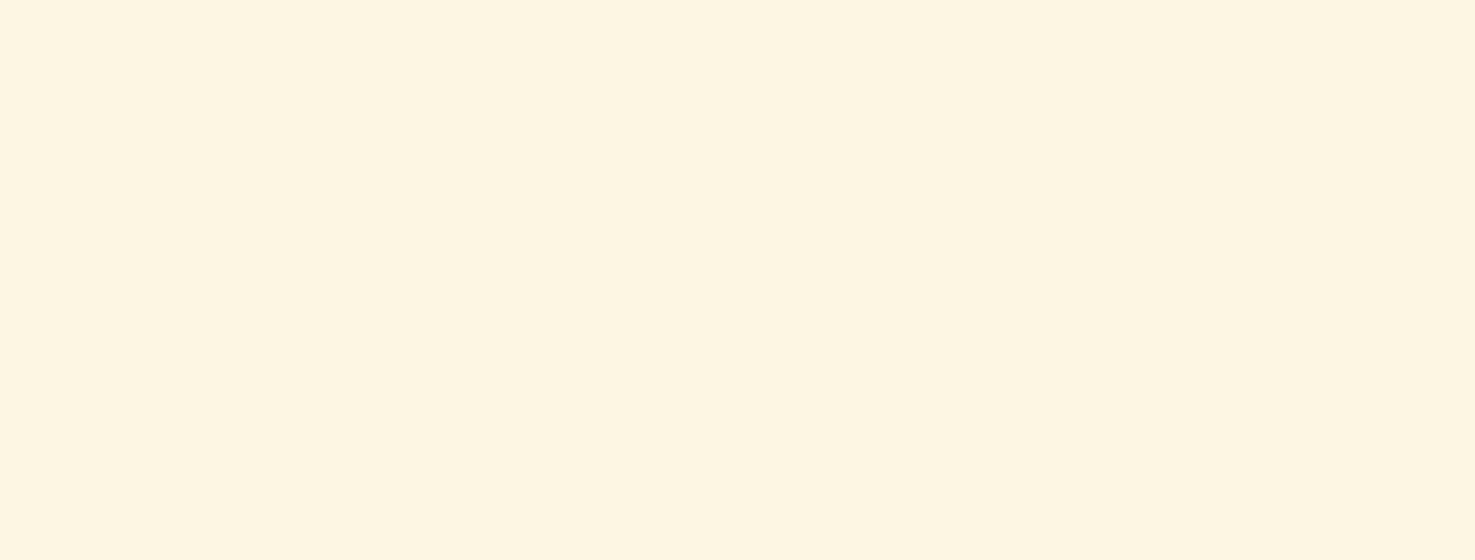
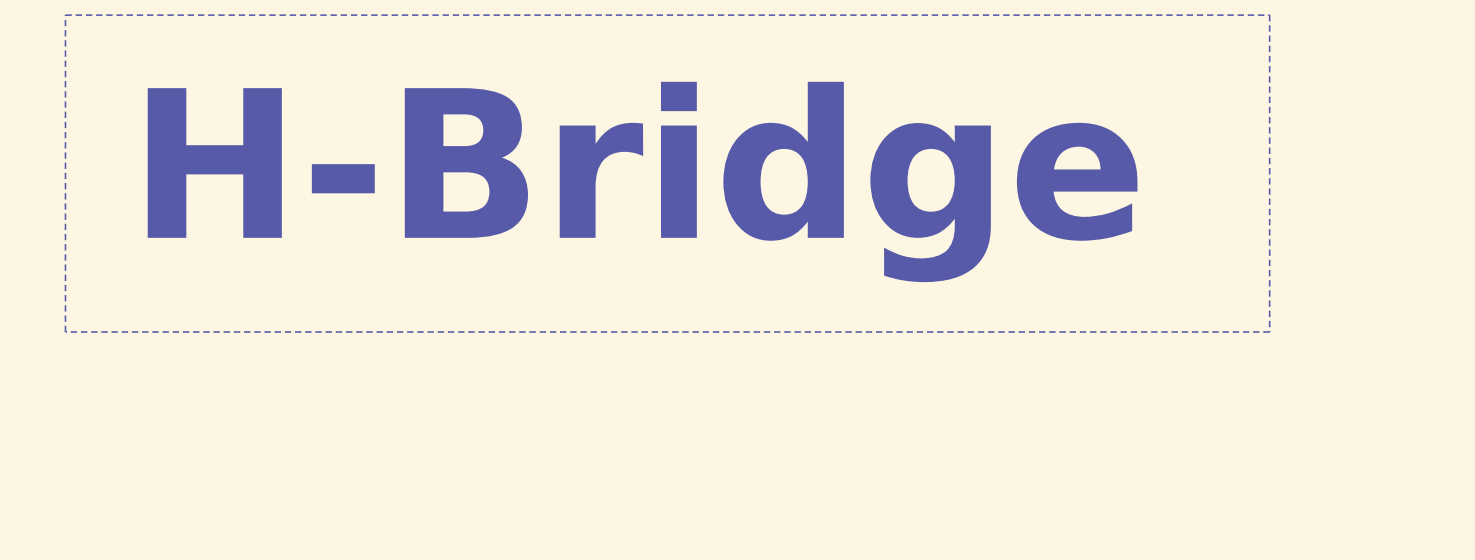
line: none -> (65, 15) (1269, 15) (1269, 332) (65, 332) (65, 15)
text: none -> H-Bridge (642, 181)

